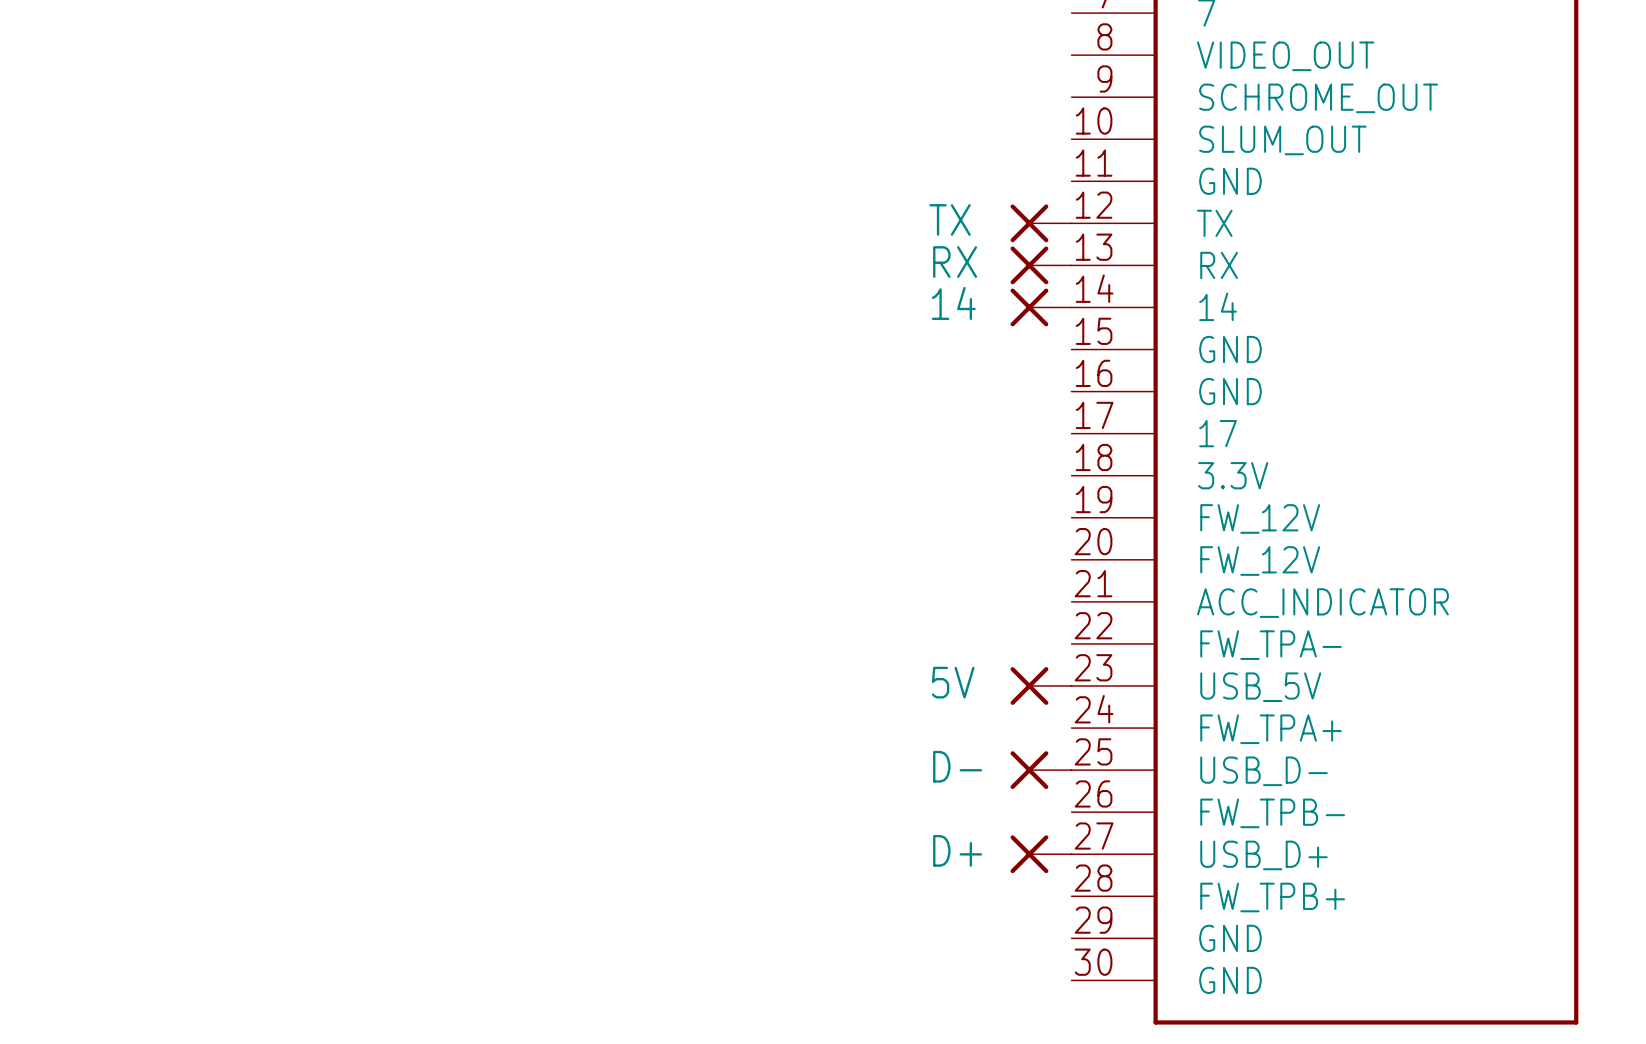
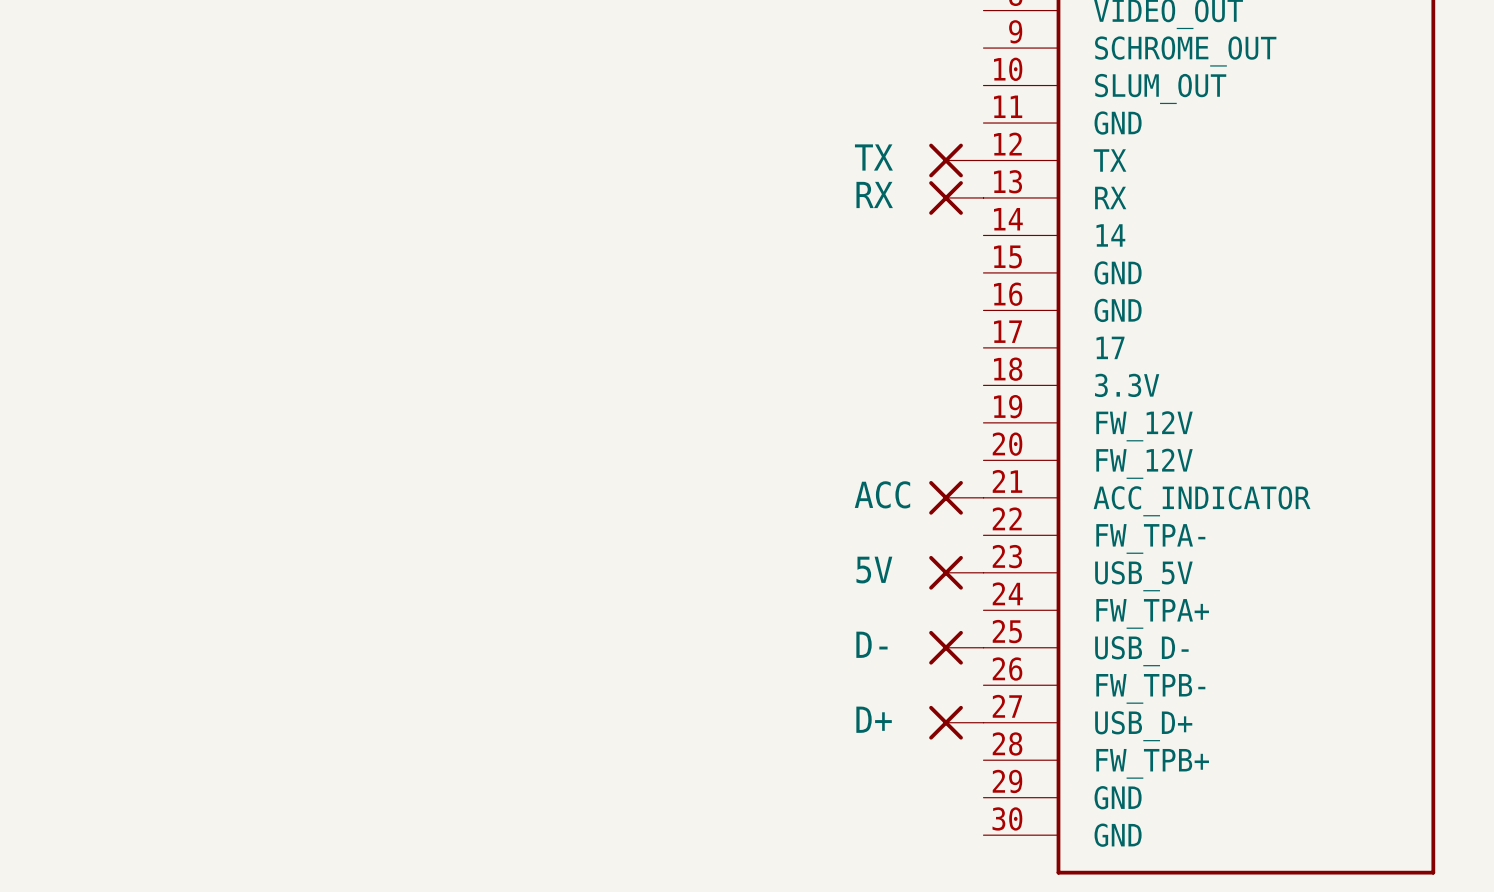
14: (1041, 307) -> none
ACC: none -> (956, 497)

